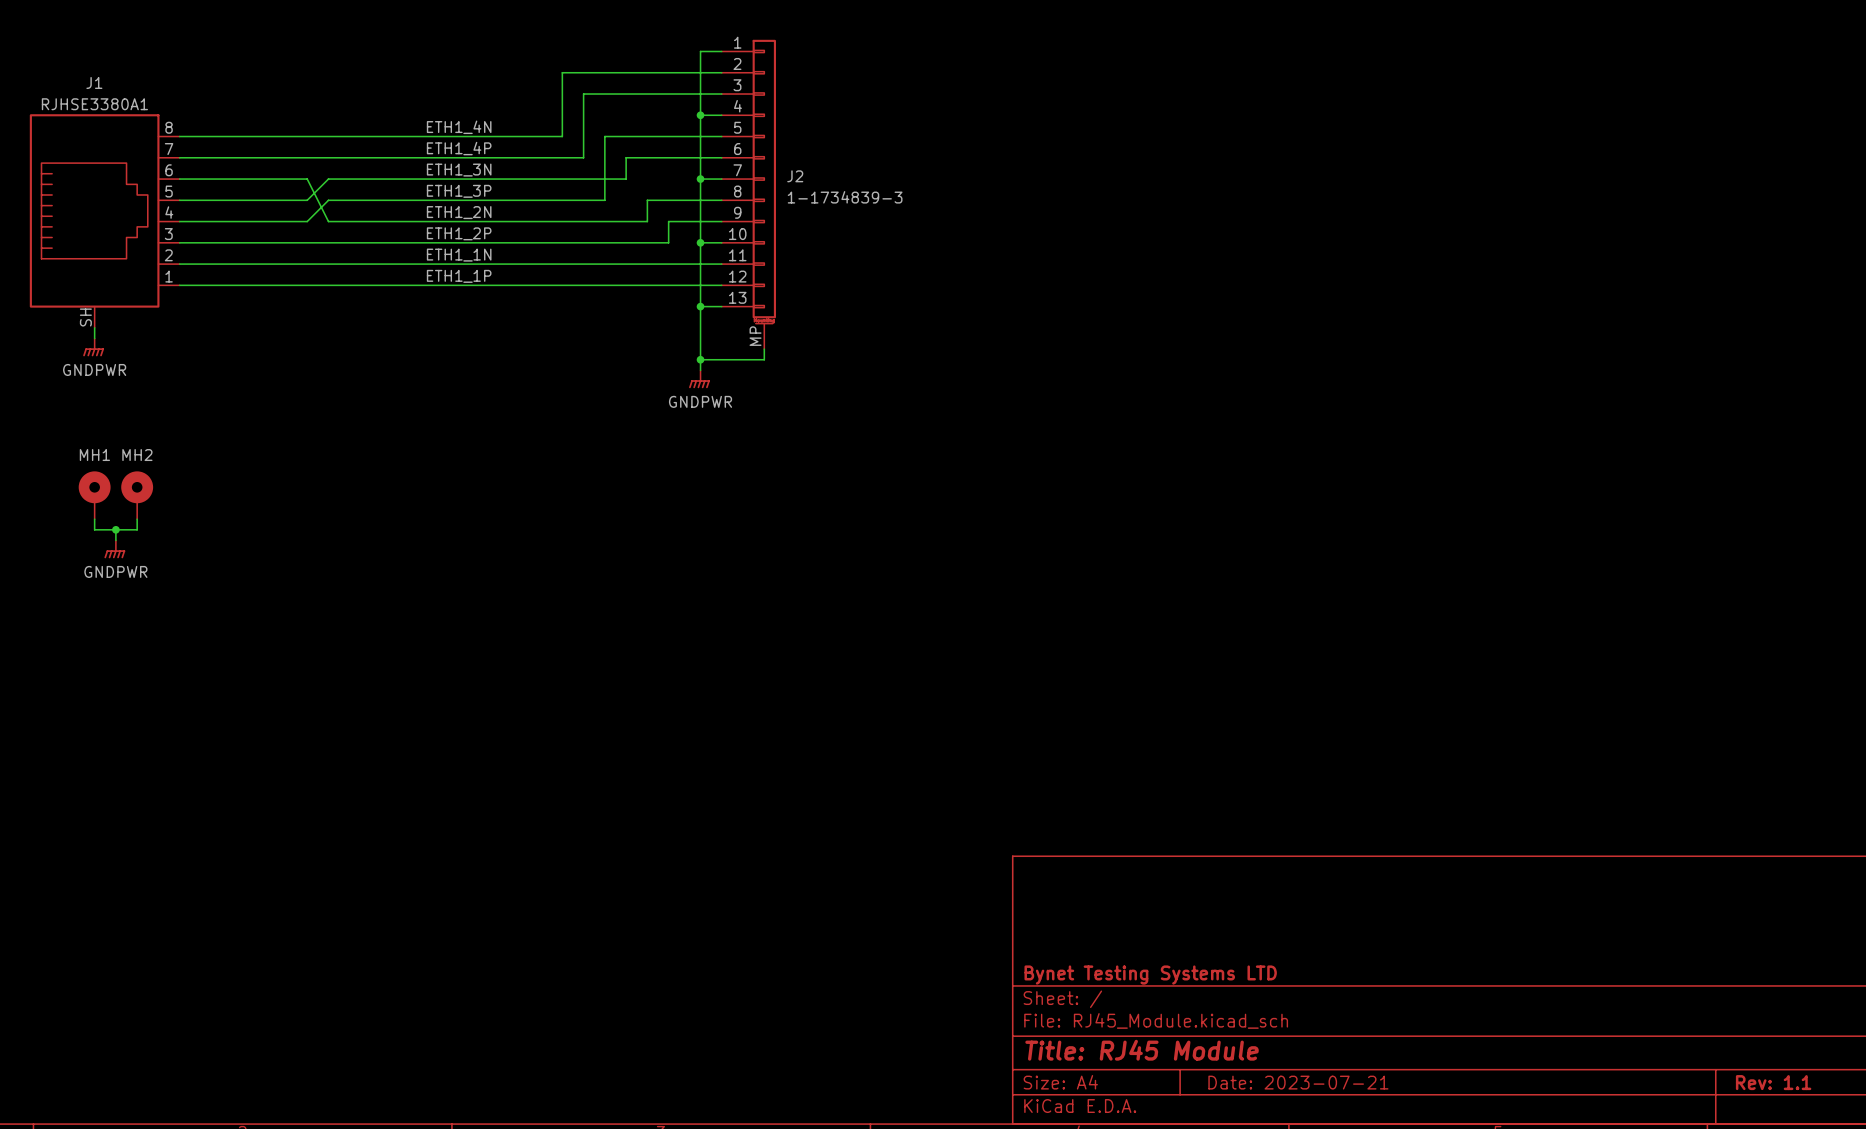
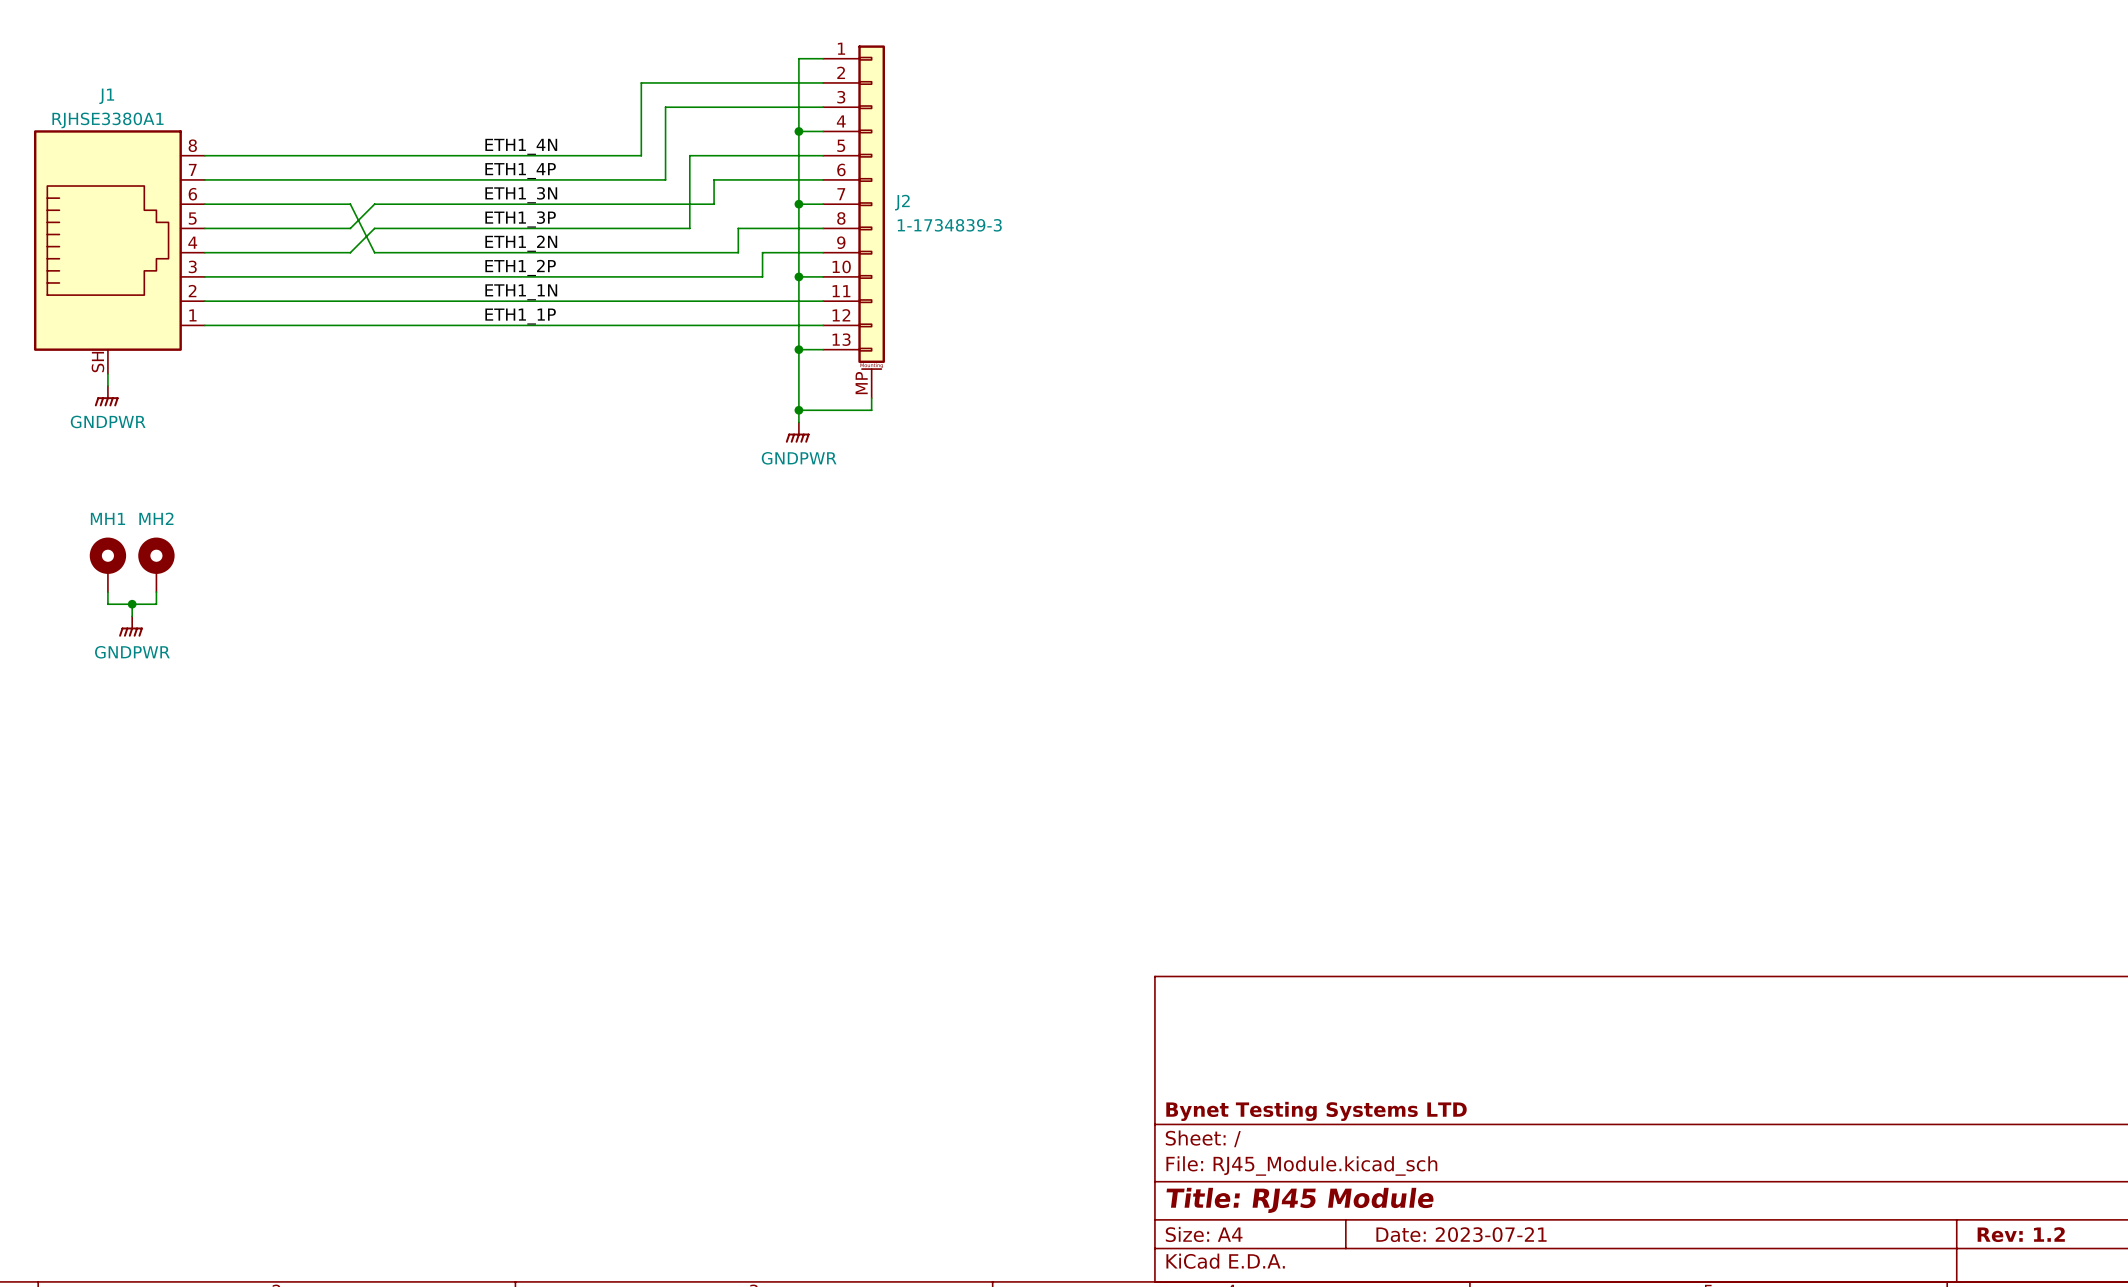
title block: Rev: 1.1 (1773, 1082) -> Rev: 1.2 (2021, 1234)

